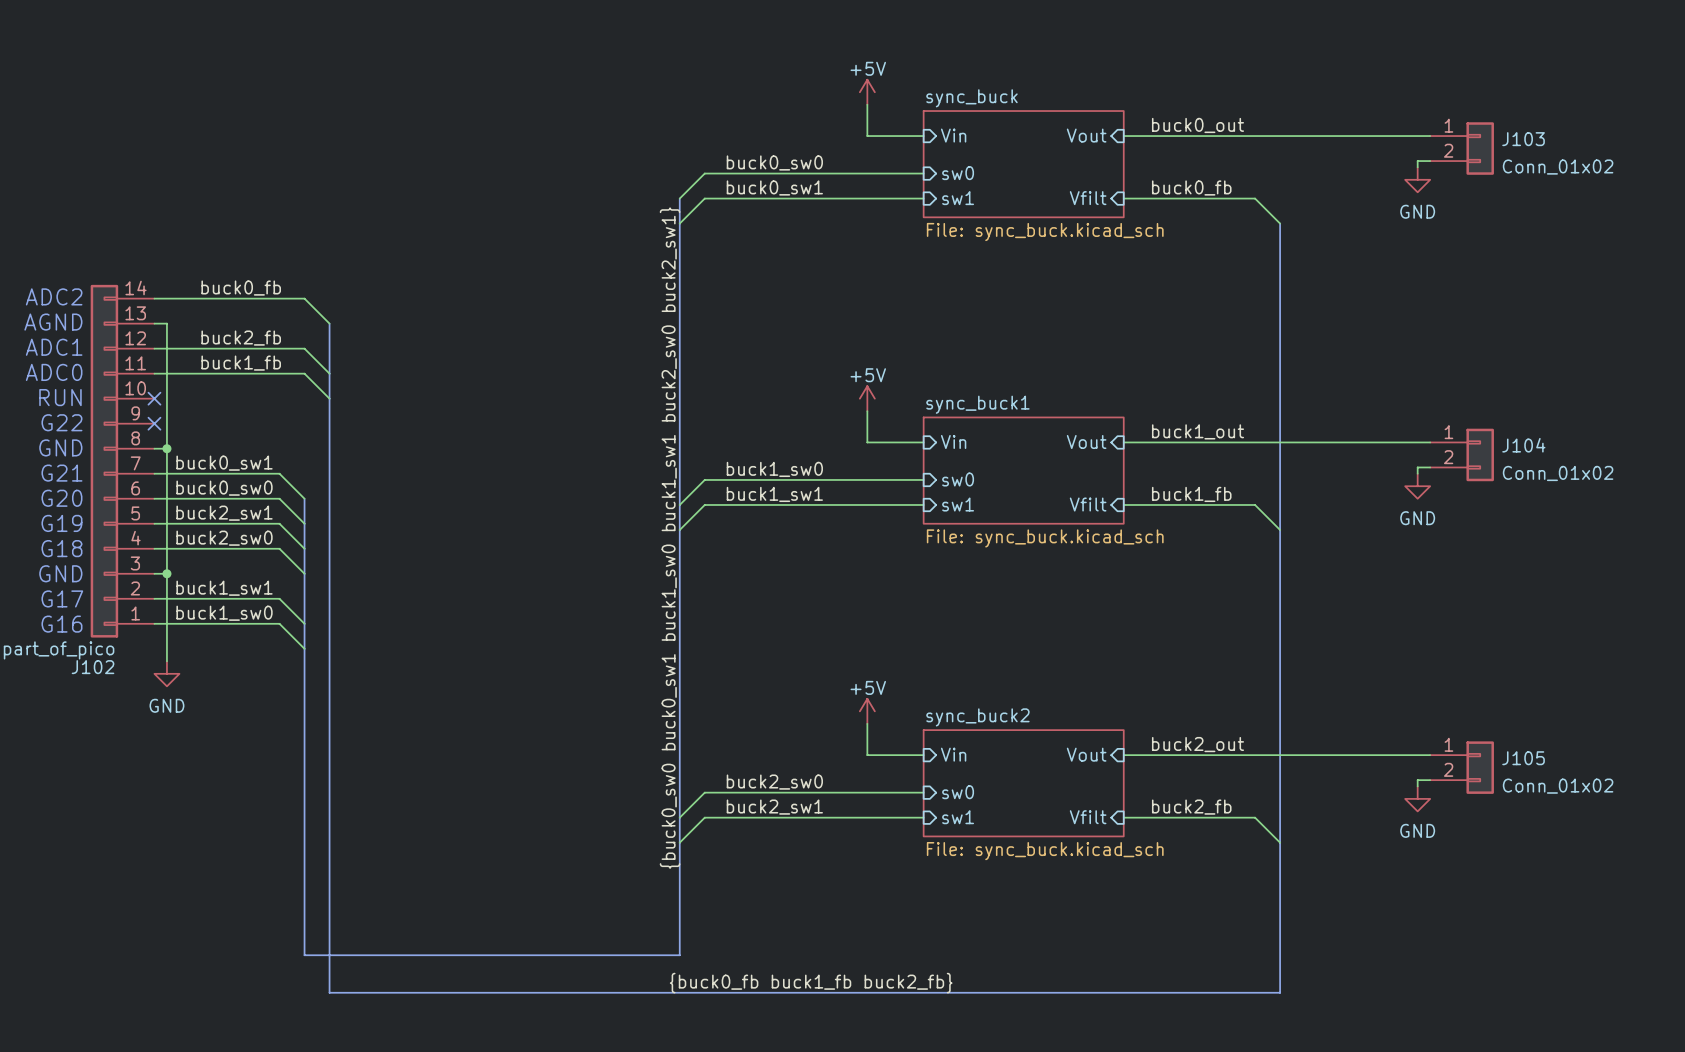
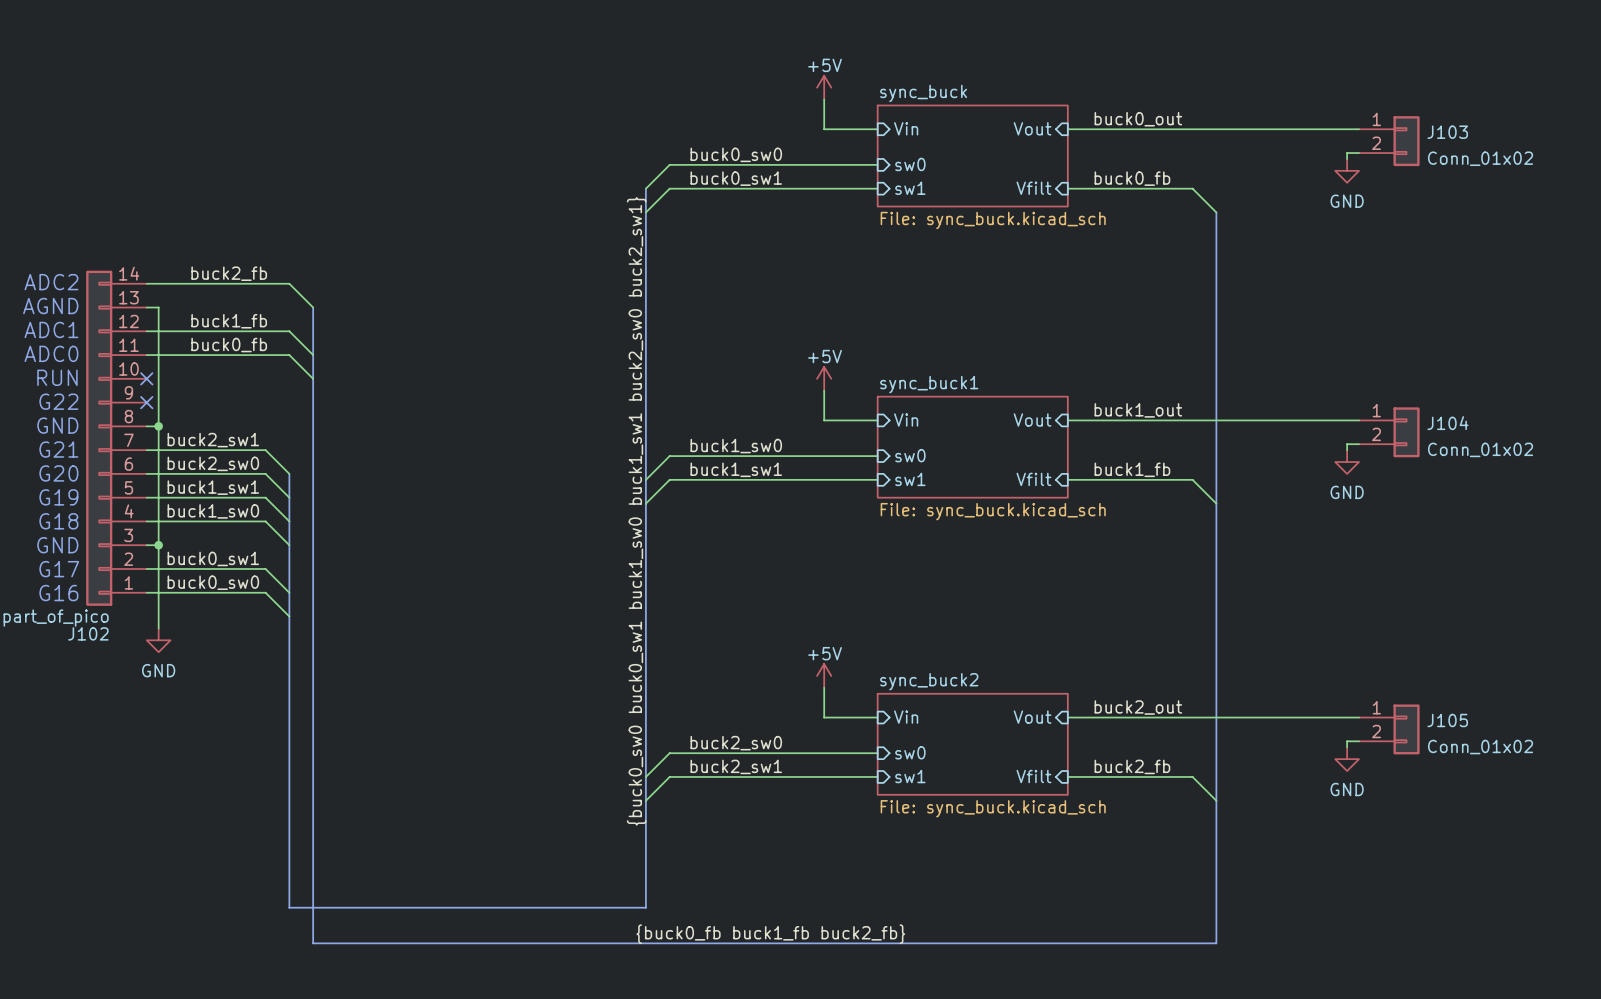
label: buck0_fb (241, 288) -> buck2_fb (229, 273)
label: buck2_fb (241, 338) -> buck1_fb (229, 321)
label: buck1_fb (241, 363) -> buck0_fb (229, 345)
label: buck0_sw1 (224, 463) -> buck2_sw1 (213, 440)
label: buck0_sw0 (224, 488) -> buck2_sw0 (213, 463)
label: buck2_sw1 (224, 513) -> buck1_sw1 (213, 487)
label: buck2_sw0 (224, 538) -> buck1_sw0 (213, 511)
label: buck1_sw1 (224, 588) -> buck0_sw1 (213, 558)
label: buck1_sw0 (224, 613) -> buck0_sw0 (213, 582)

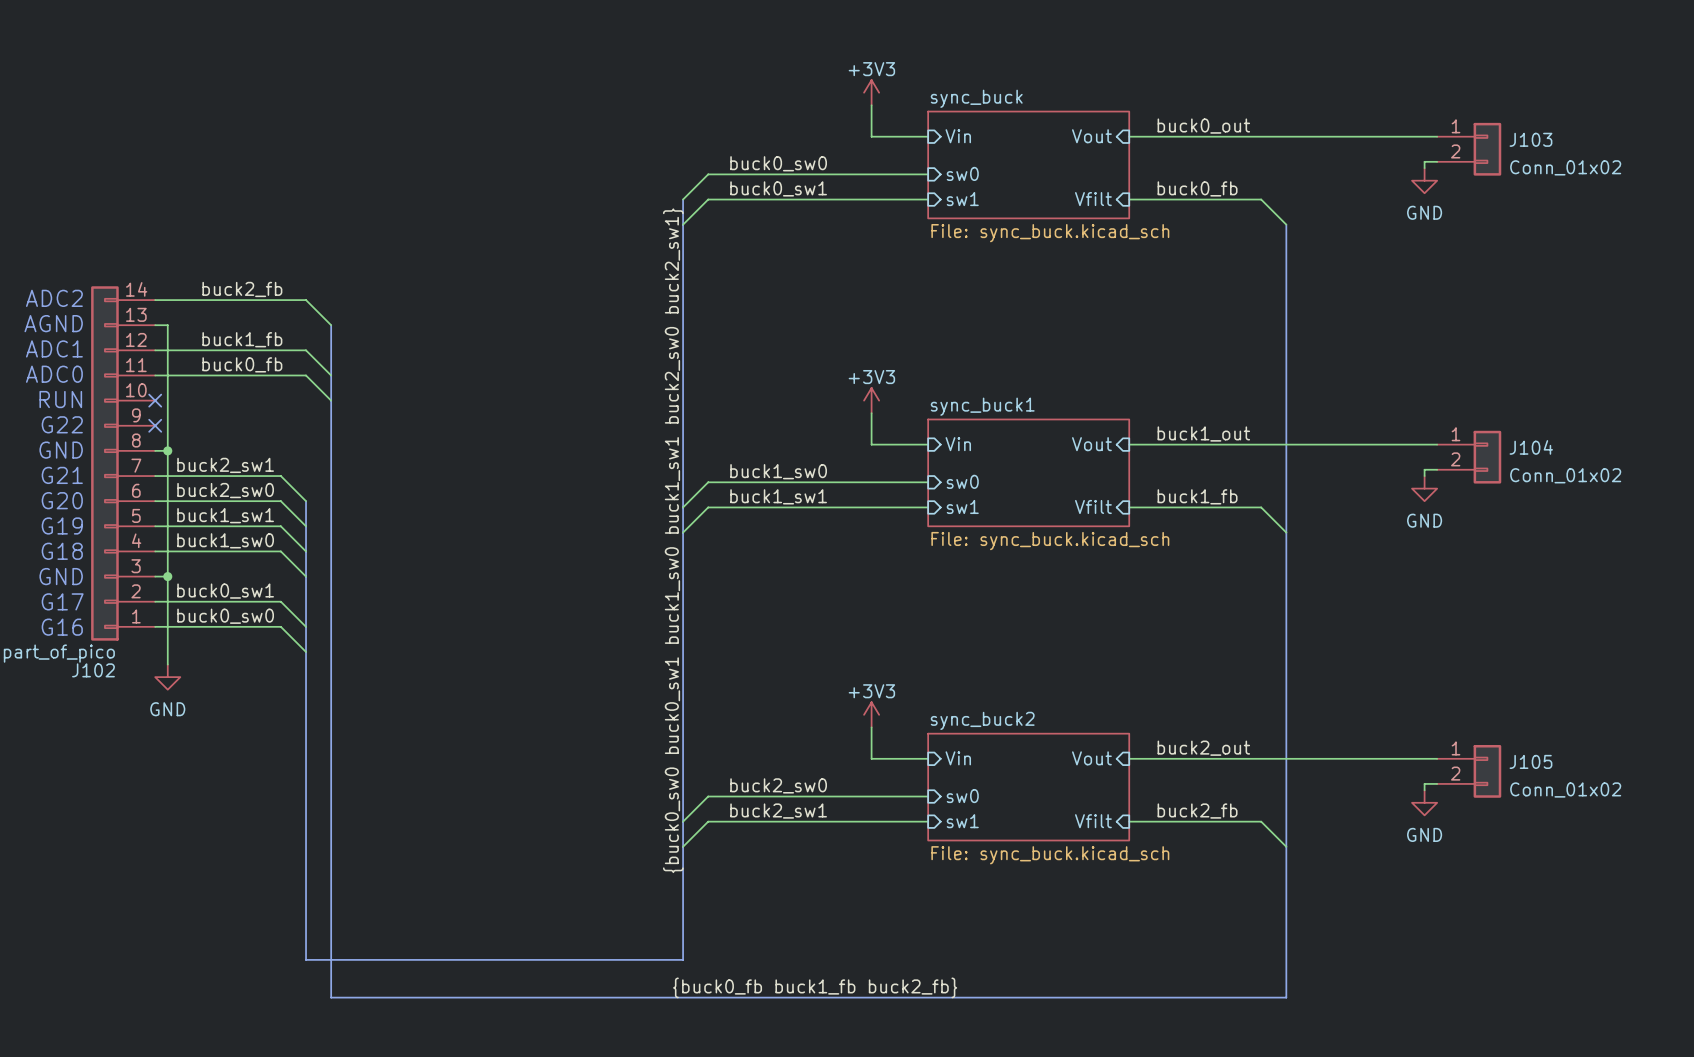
power symbol: +5V (824, 87) -> +3V3 (871, 92)
power symbol: +5V (824, 378) -> +3V3 (871, 400)
power symbol: +5V (824, 675) -> +3V3 (871, 714)

